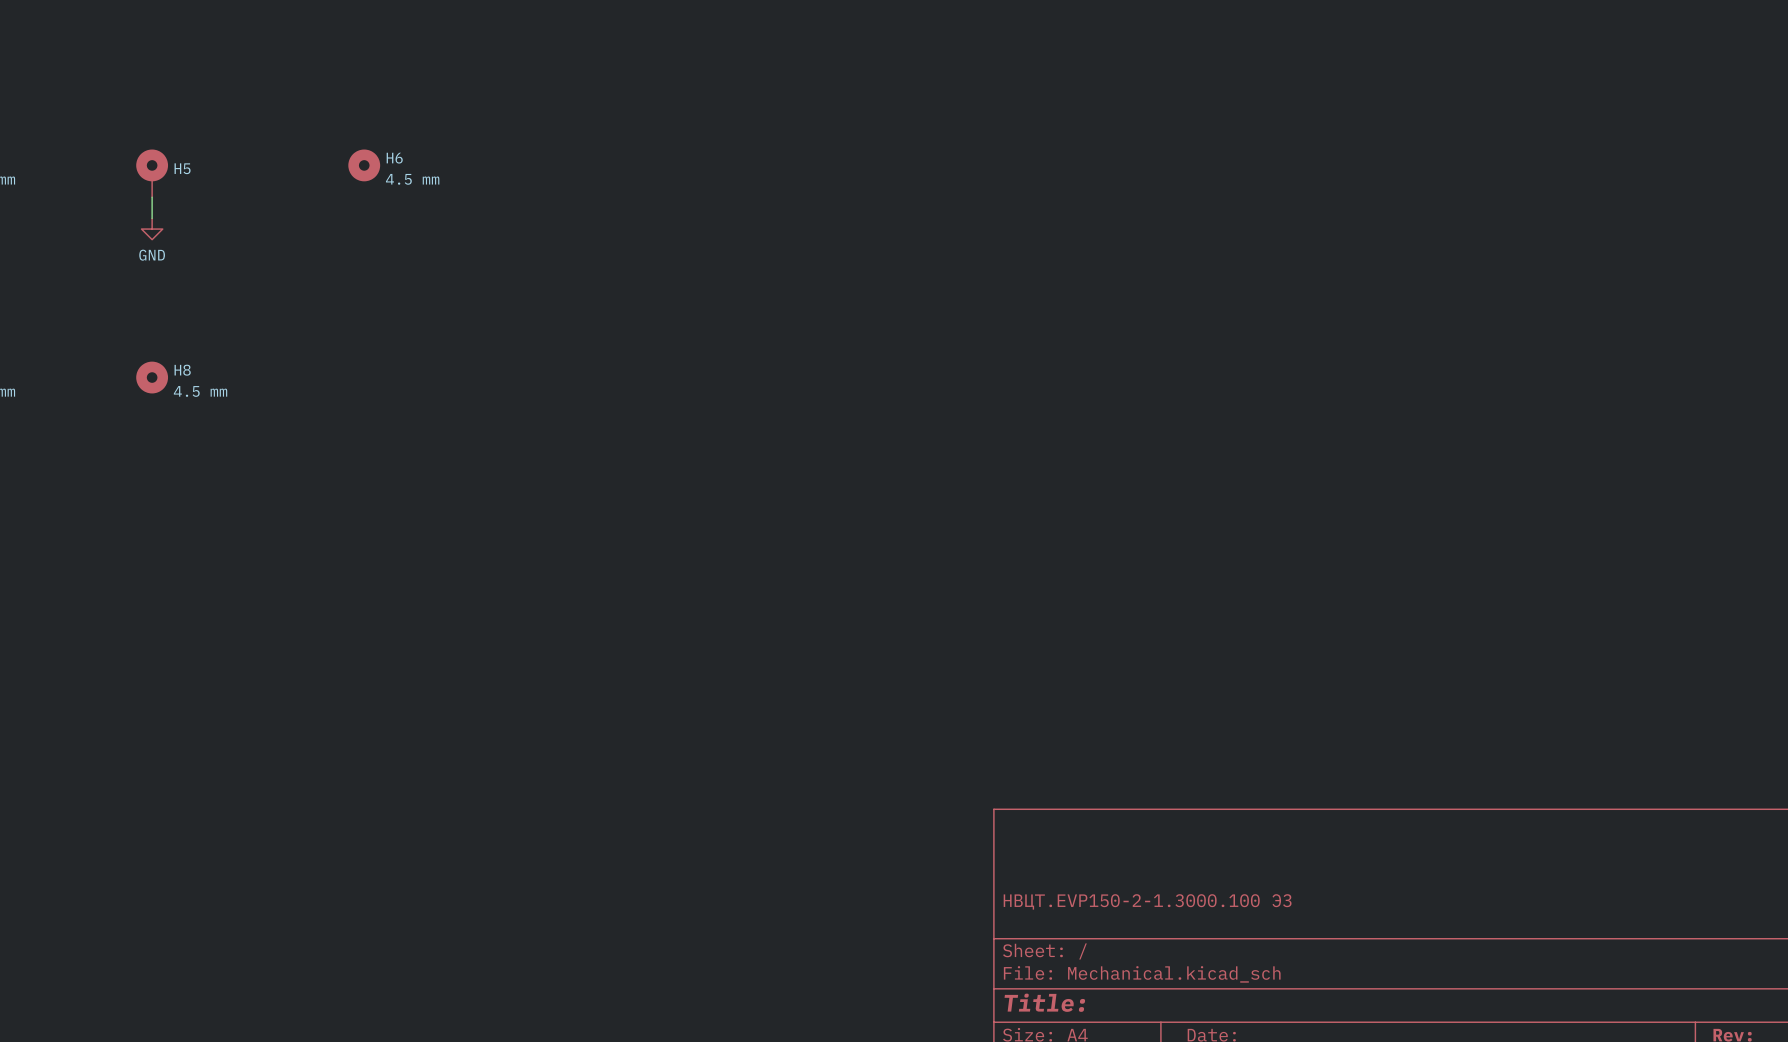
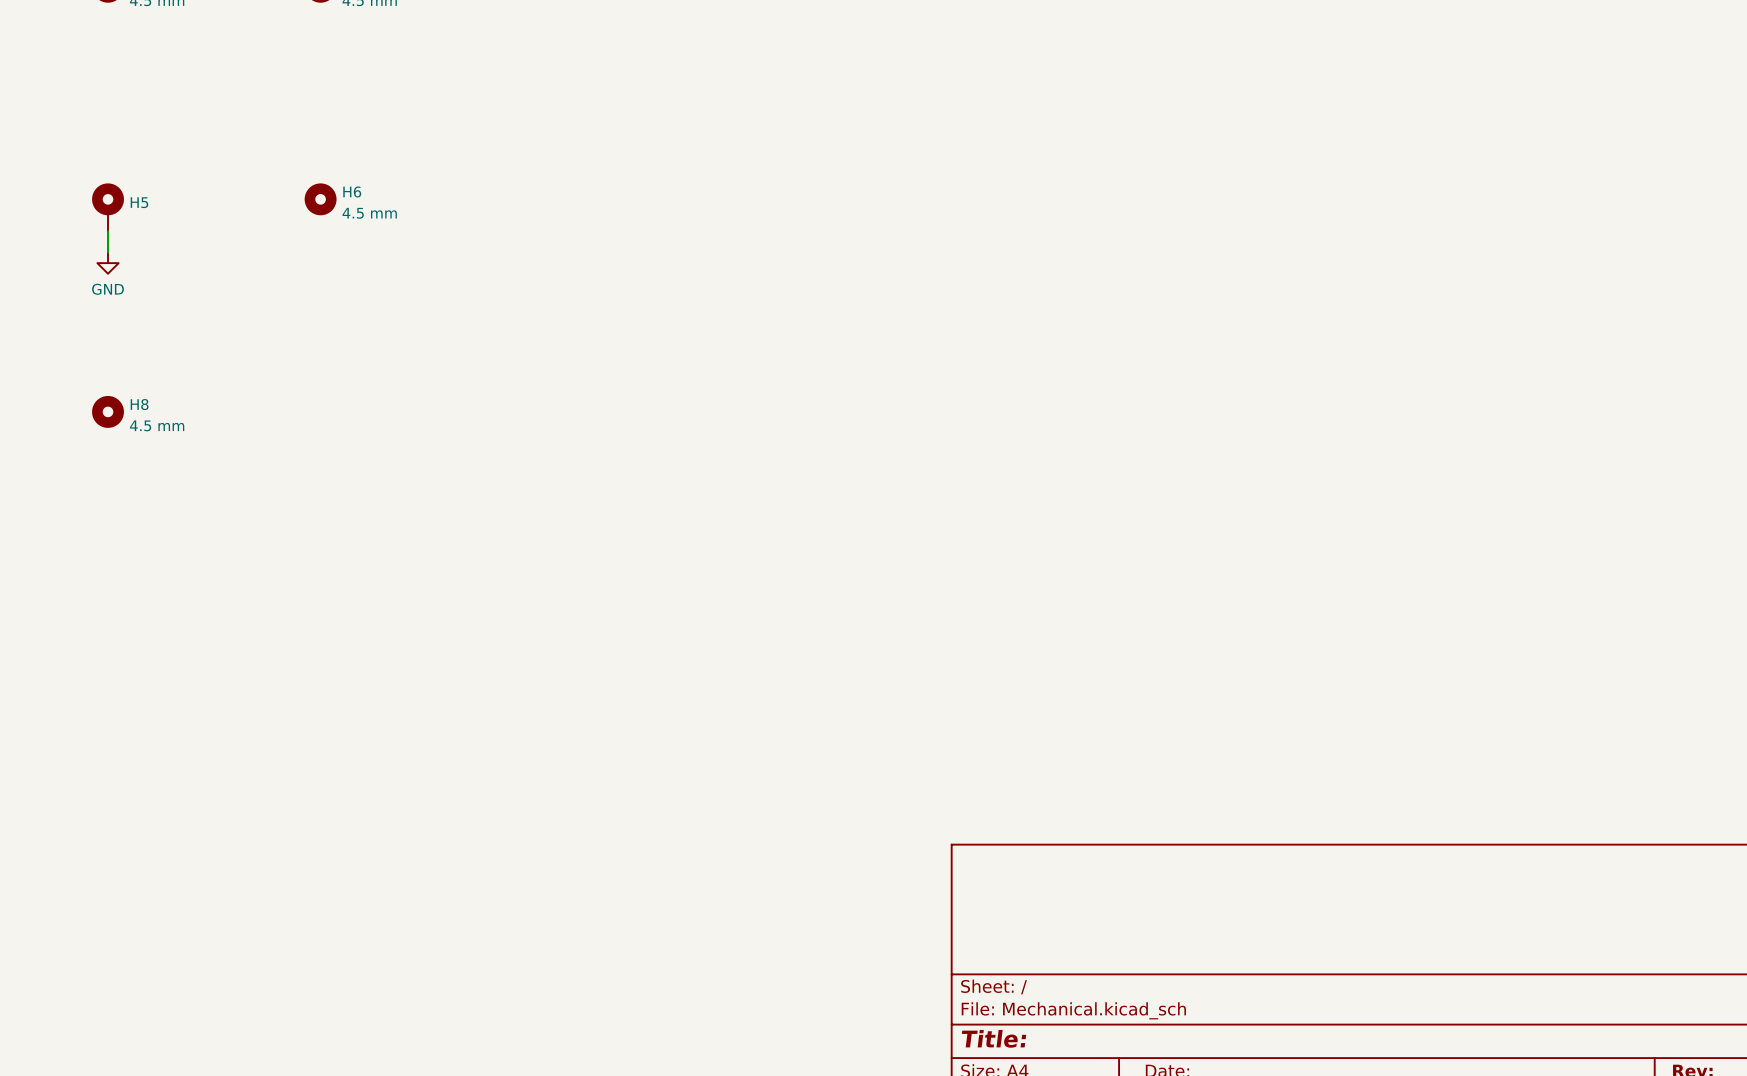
title block: НВЦТ.EVP150-2-1.3000.100 Э3 (1147, 901) -> none

